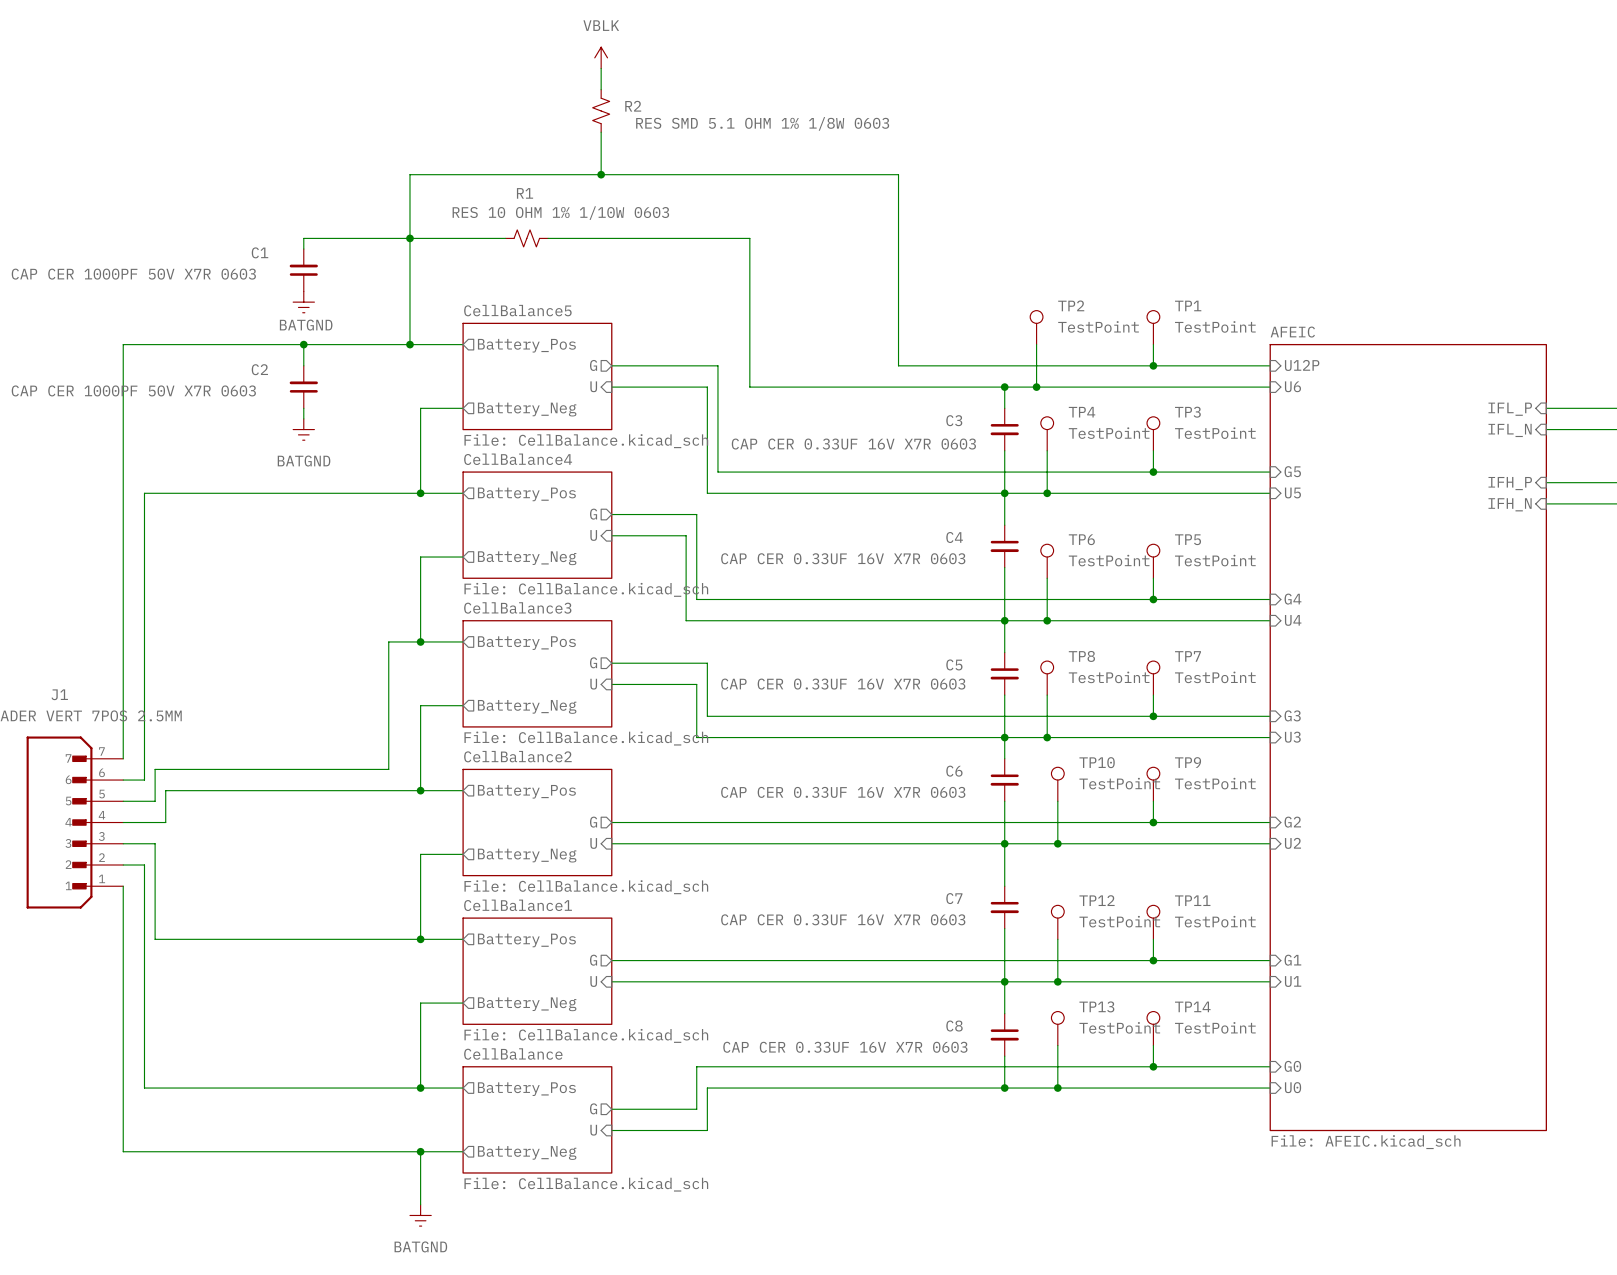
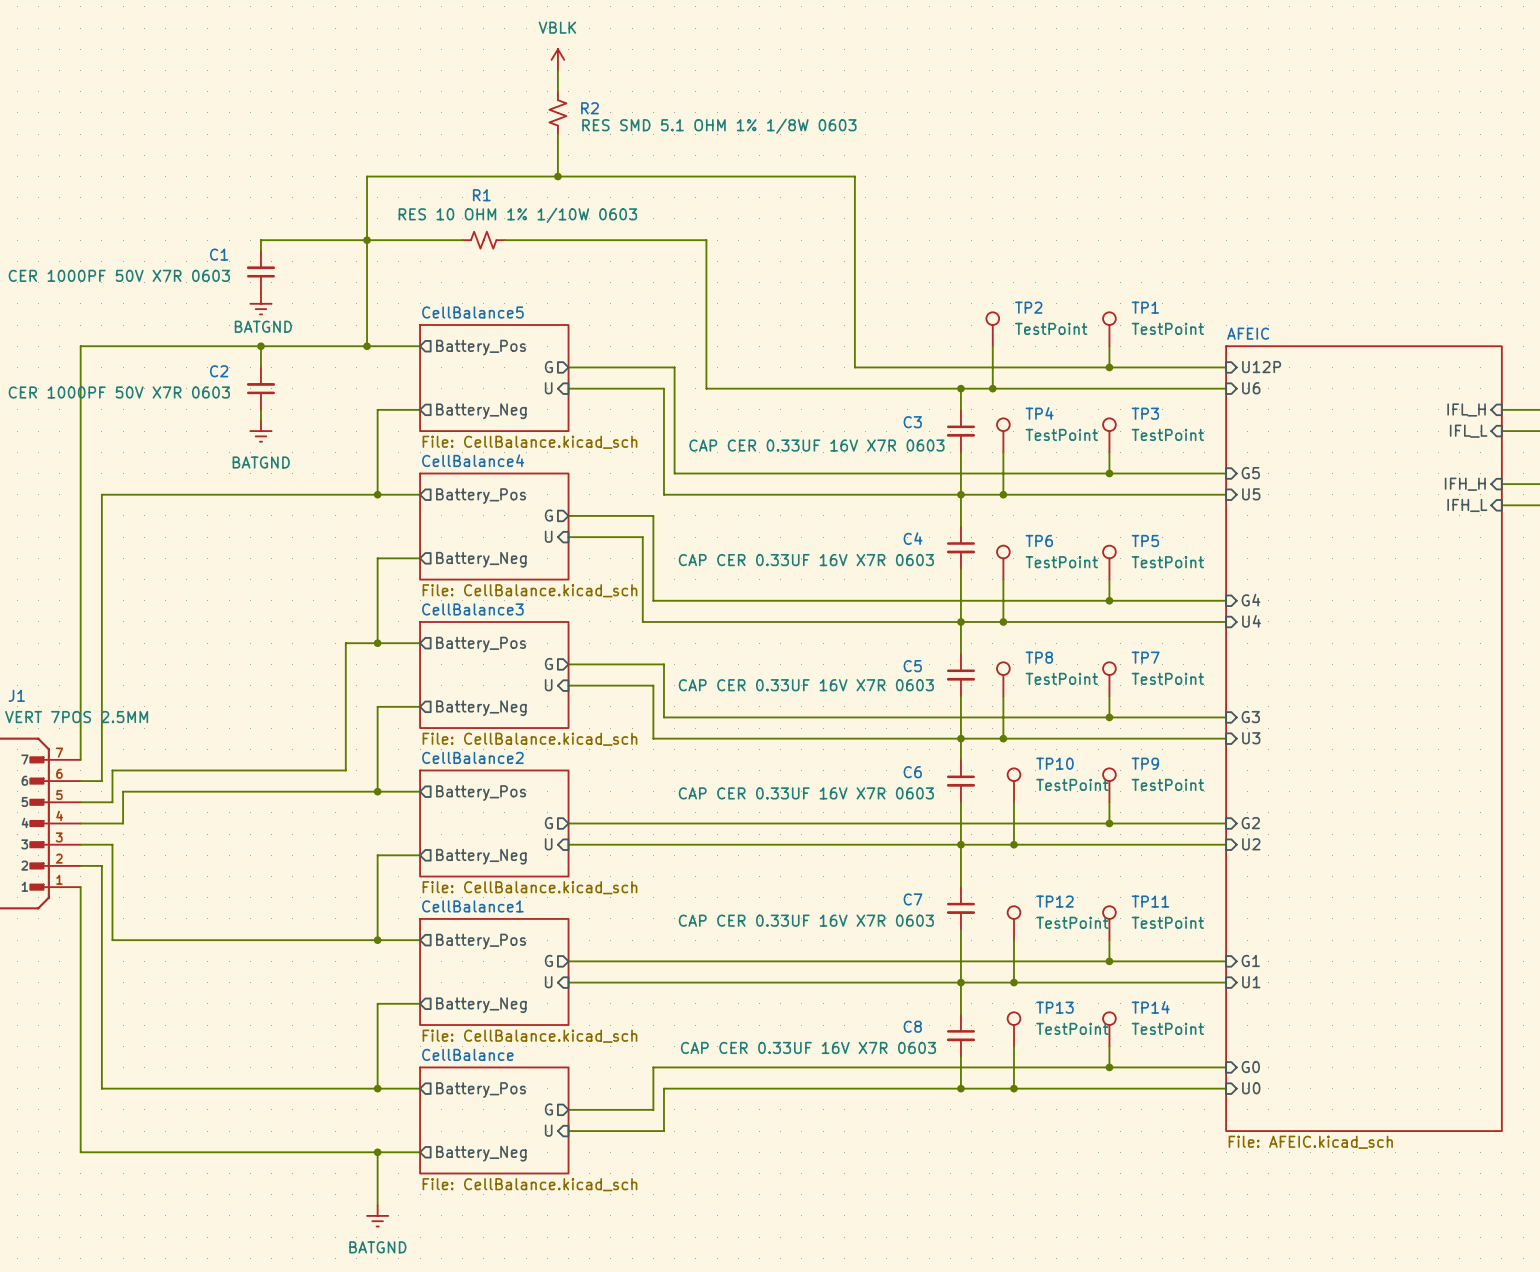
sheet pin: IFL_P (1510, 409) -> IFL_H (1466, 409)
sheet pin: IFL_N (1510, 430) -> IFL_L (1468, 431)
sheet pin: IFH_P (1510, 483) -> IFH_H (1465, 484)
sheet pin: IFH_N (1510, 504) -> IFH_L (1467, 505)

